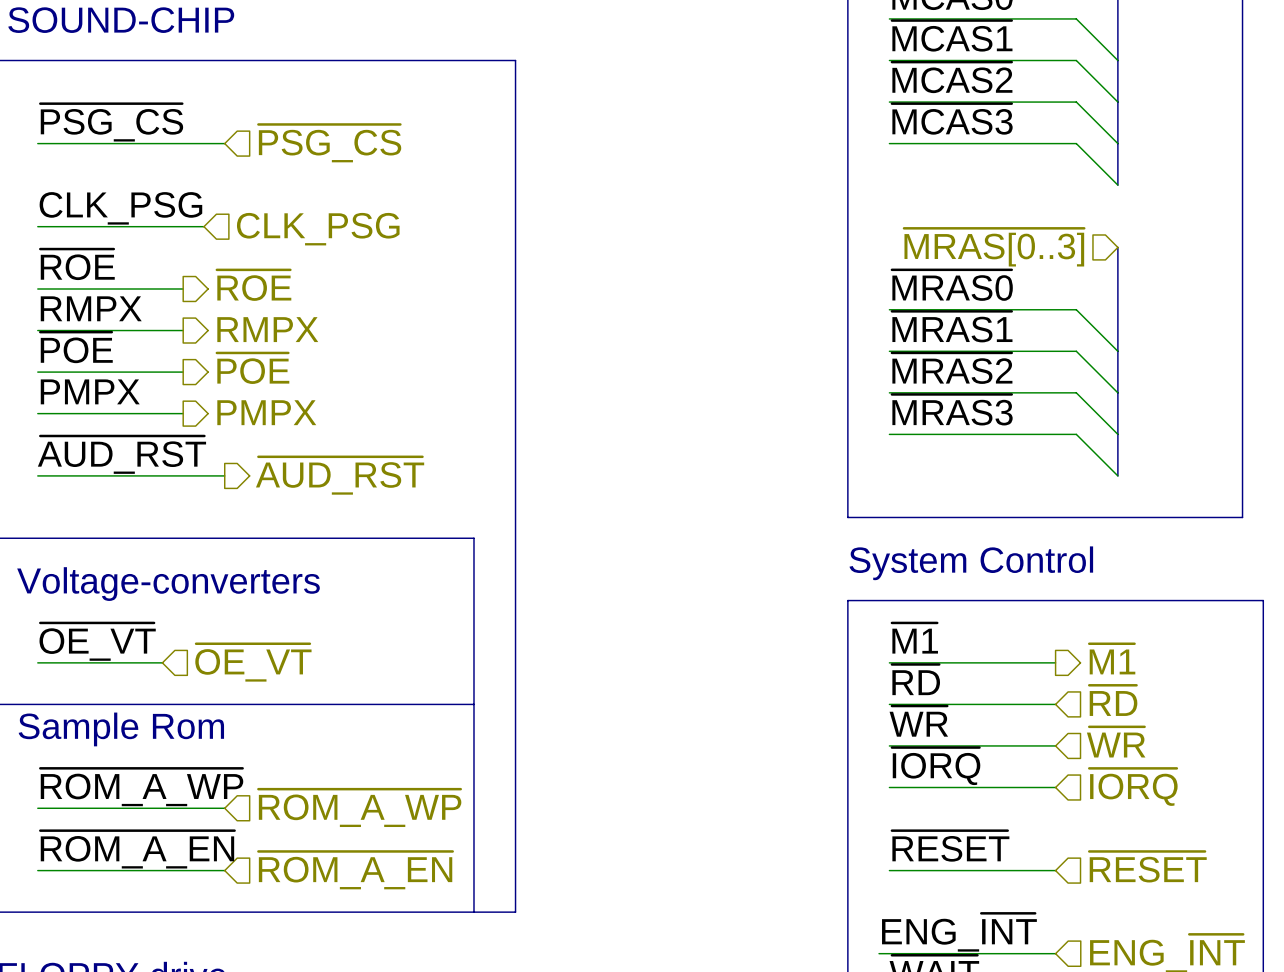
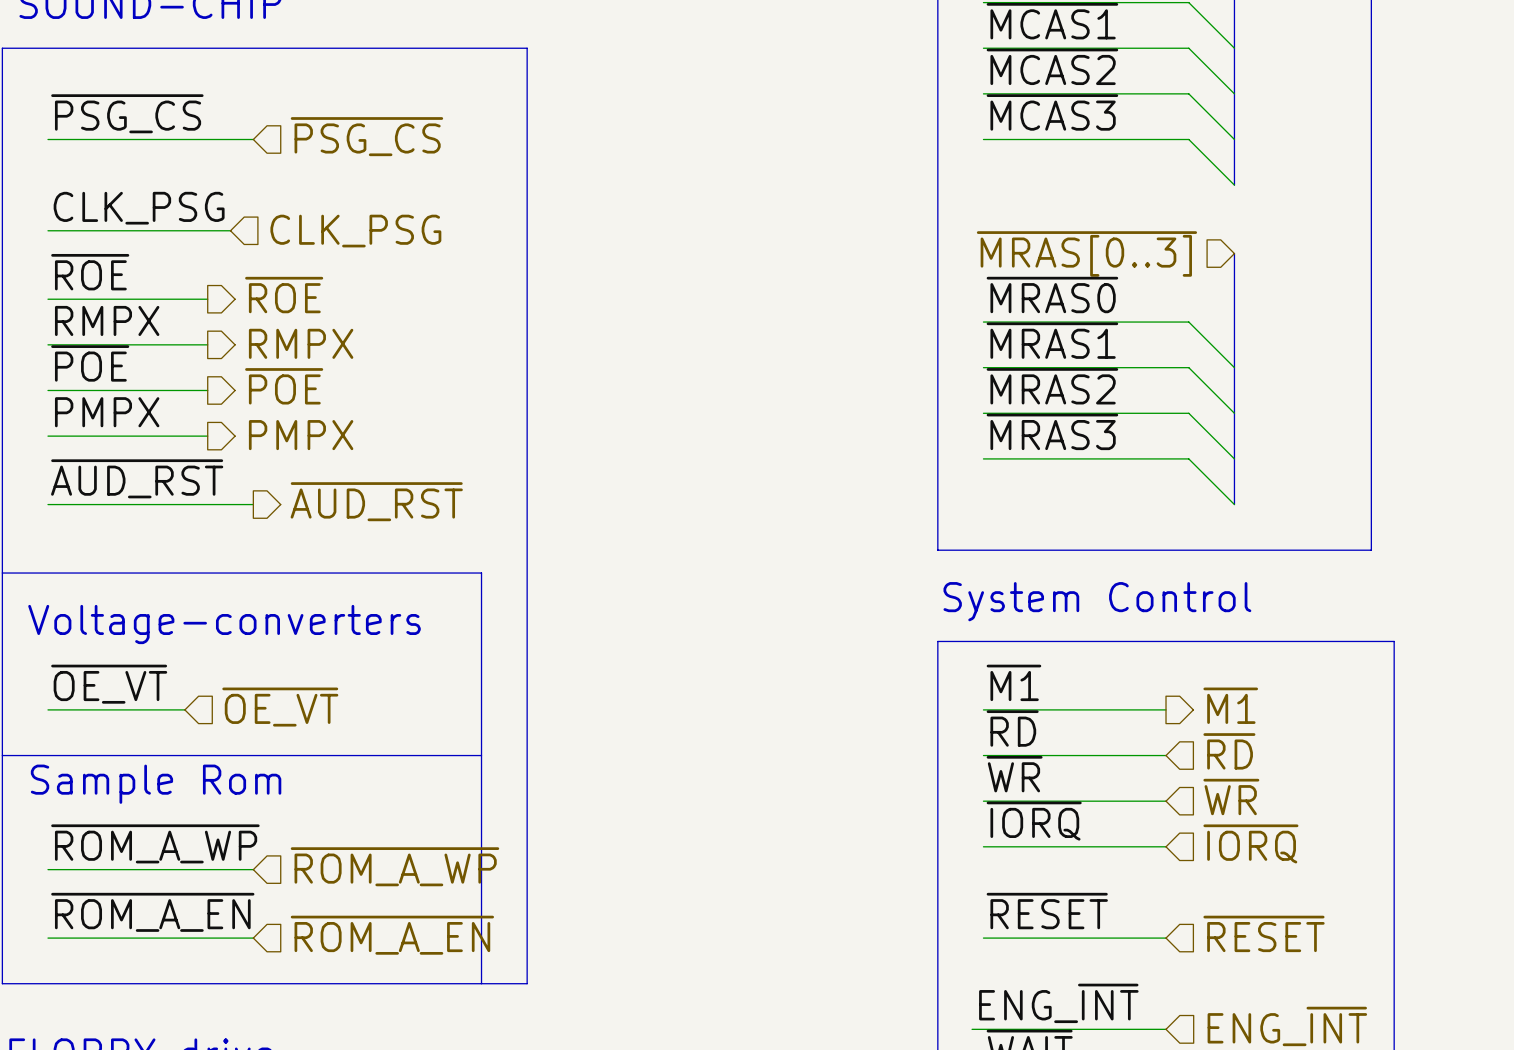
line: (473, 60) (515, 60) (515, 912) (473, 912) -> (527, 48) (527, 573)
line: (432, 538) (473, 538) -> (481, 573) (481, 983)
line: (432, 704) (473, 704) -> none

